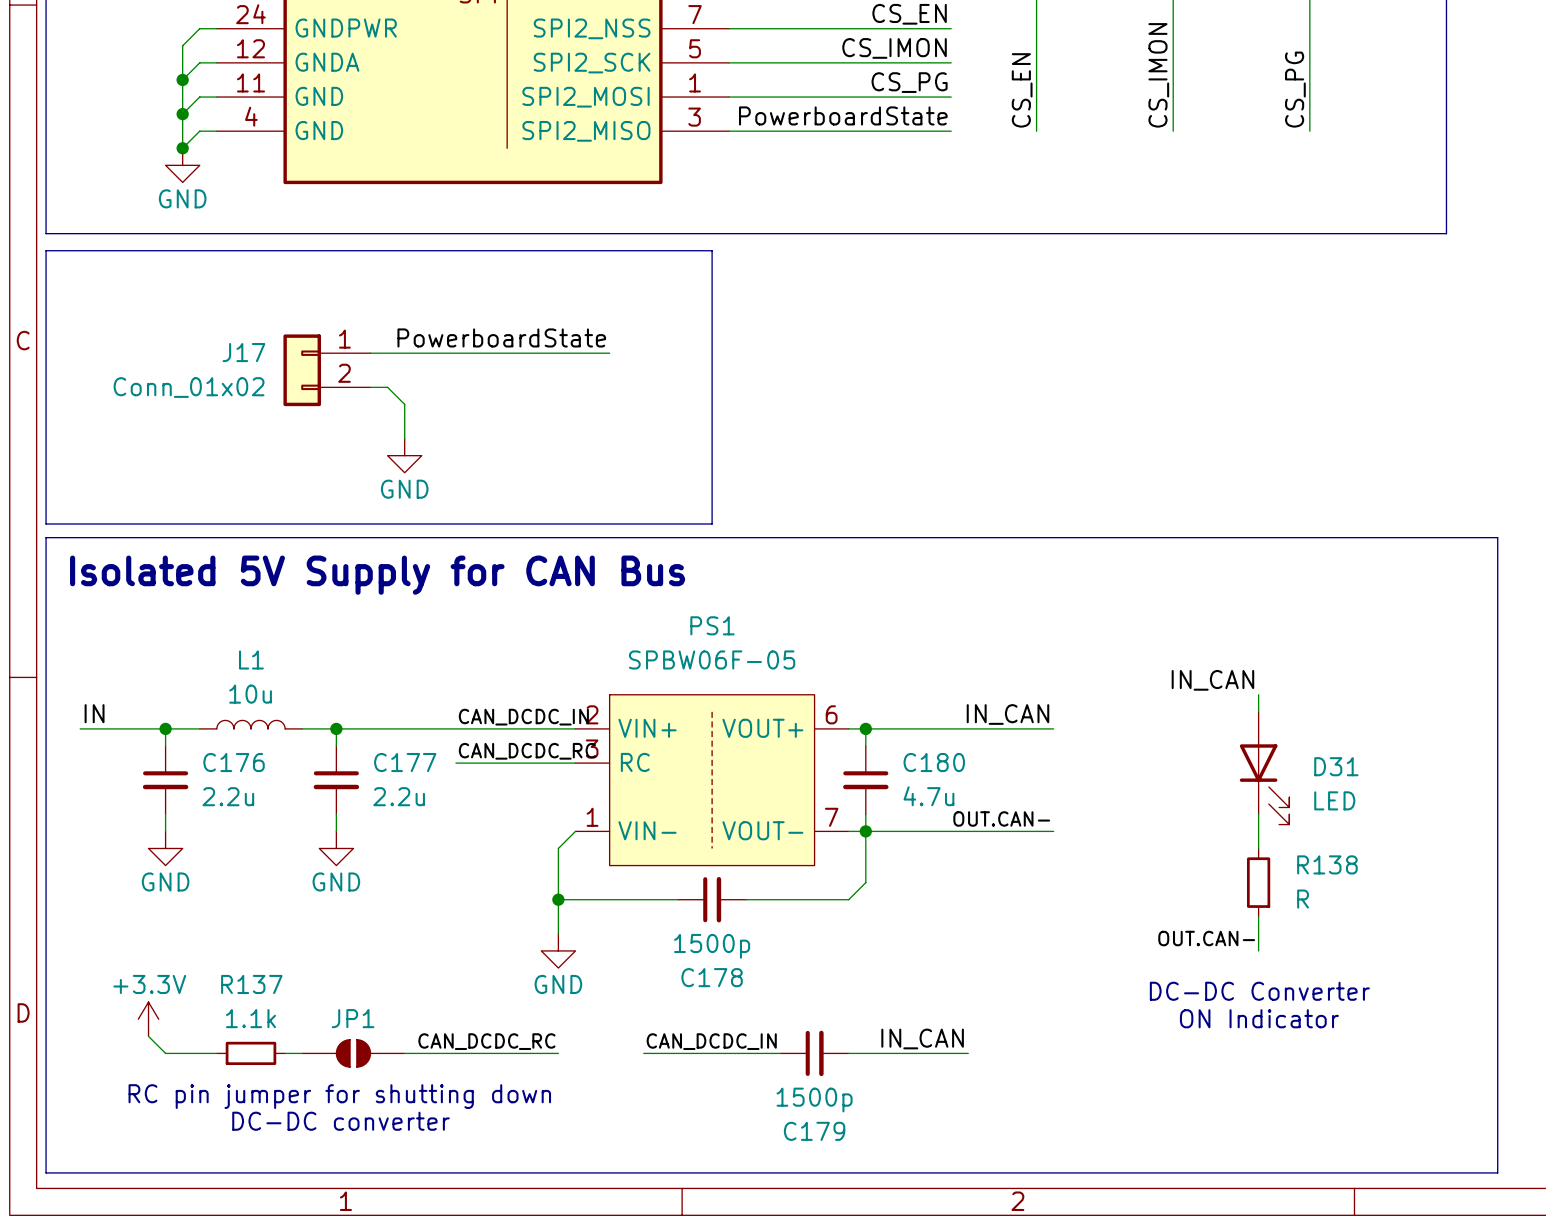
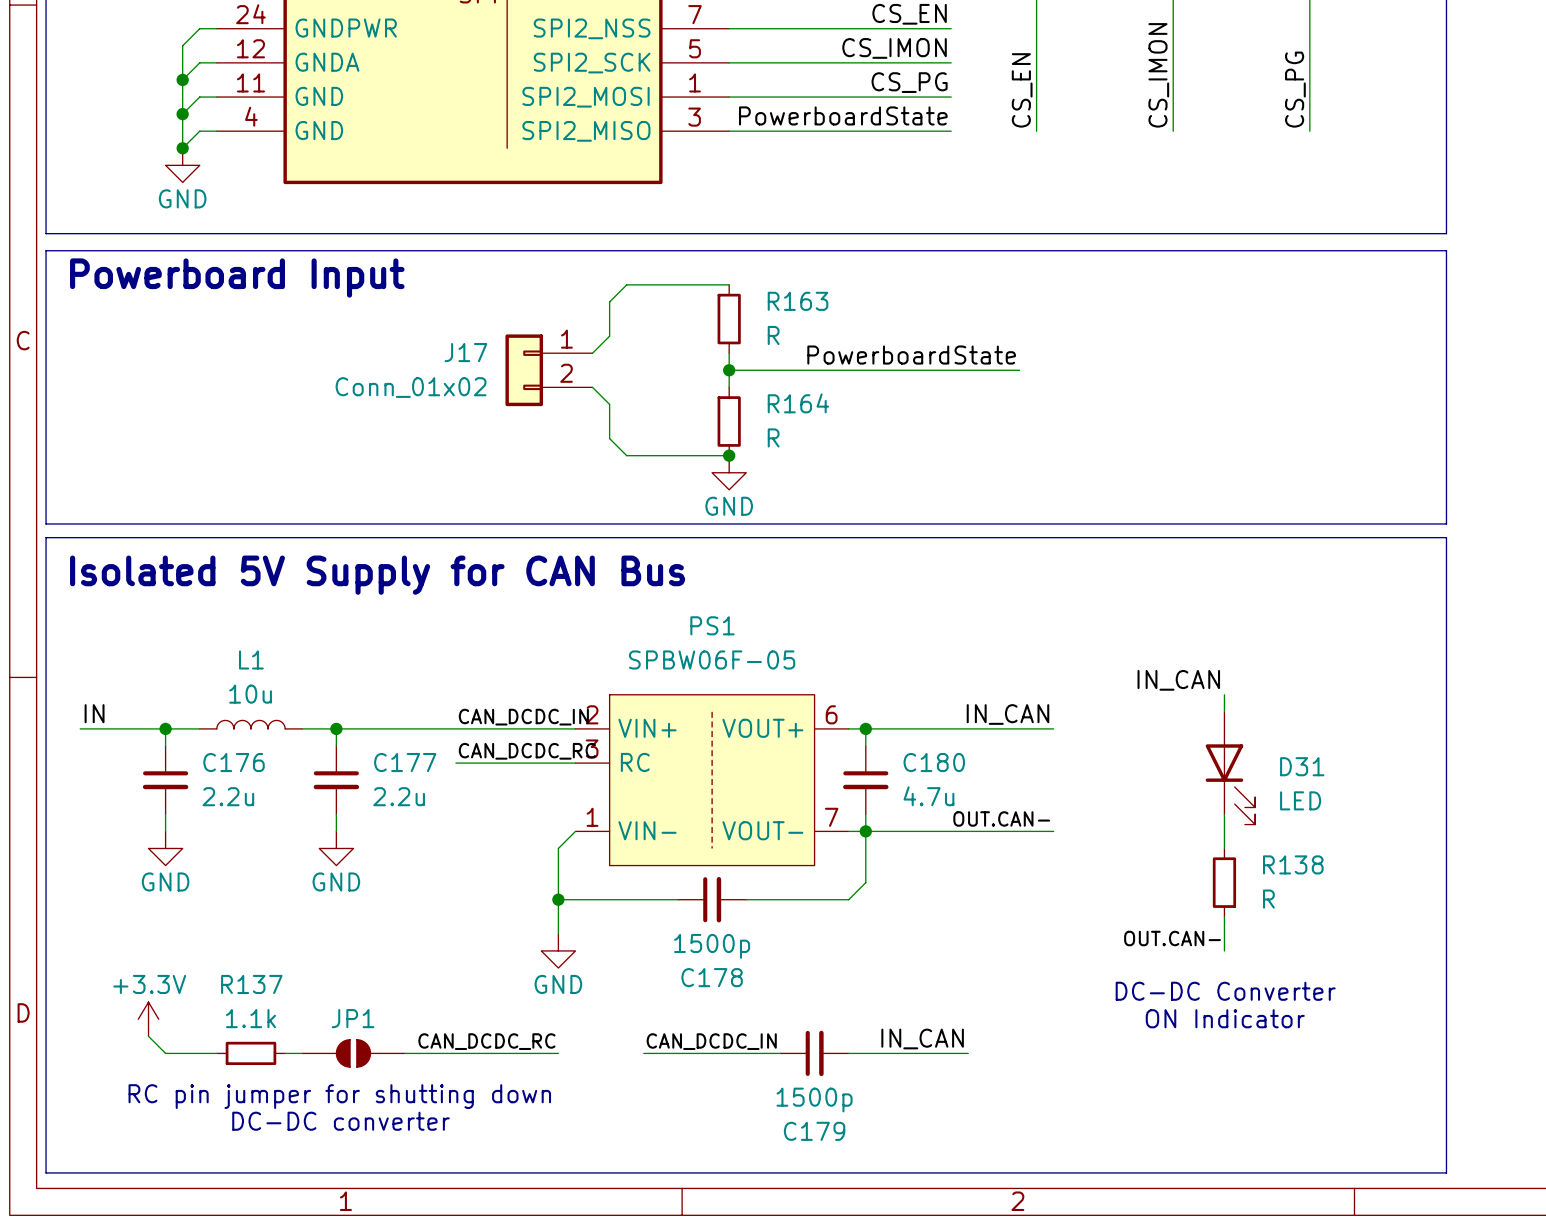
line: (712, 250) (712, 523) -> (712, 250) (1446, 250) (1446, 523) (712, 523)
text: none -> Powerboard Input (237, 278)
wire: none -> (729, 284) (626, 284) (609, 301) (609, 336) (592, 353)
R163: none -> R (729, 319)
label: PowerboardState (501, 337) -> none
wire: (370, 353) (609, 353) -> none
wire: none -> (729, 353) (729, 387)
label: none -> PowerboardState (911, 355)
J17 position: (326, 370) -> (549, 370)
wire: none -> (729, 370) (1019, 370)
junction: none -> (729, 370)
wire: (370, 387) (387, 387) (404, 404) (404, 438) -> none
wire: none -> (592, 387) (609, 404) (609, 438) (626, 455) (729, 455)
R164: none -> R (729, 421)
power symbol position: GND (404, 455) -> GND (729, 472)
junction: none -> (729, 455)
line: (1446, 537) (1497, 537) (1497, 1172) (1446, 1172) -> (1446, 537) (1446, 1172)
label position: IN_CAN (1212, 680) -> IN_CAN (1178, 680)
wire: (1258, 694) (1258, 711) -> (1224, 694) (1224, 711)
D31 position: (1264, 768) -> (1230, 768)
wire: (1258, 814) (1258, 848) -> (1224, 814) (1224, 848)
R138 position: (1258, 882) -> (1224, 882)
wire: (1258, 916) (1258, 950) -> (1224, 916) (1224, 950)
label position: OUT.CAN- (1206, 938) -> OUT.CAN- (1172, 938)
text position: DC-DC Converter (1259, 991) -> DC-DC Converter (1225, 991)
text position: ON Indicator (1259, 1018) -> ON Indicator (1225, 1018)

